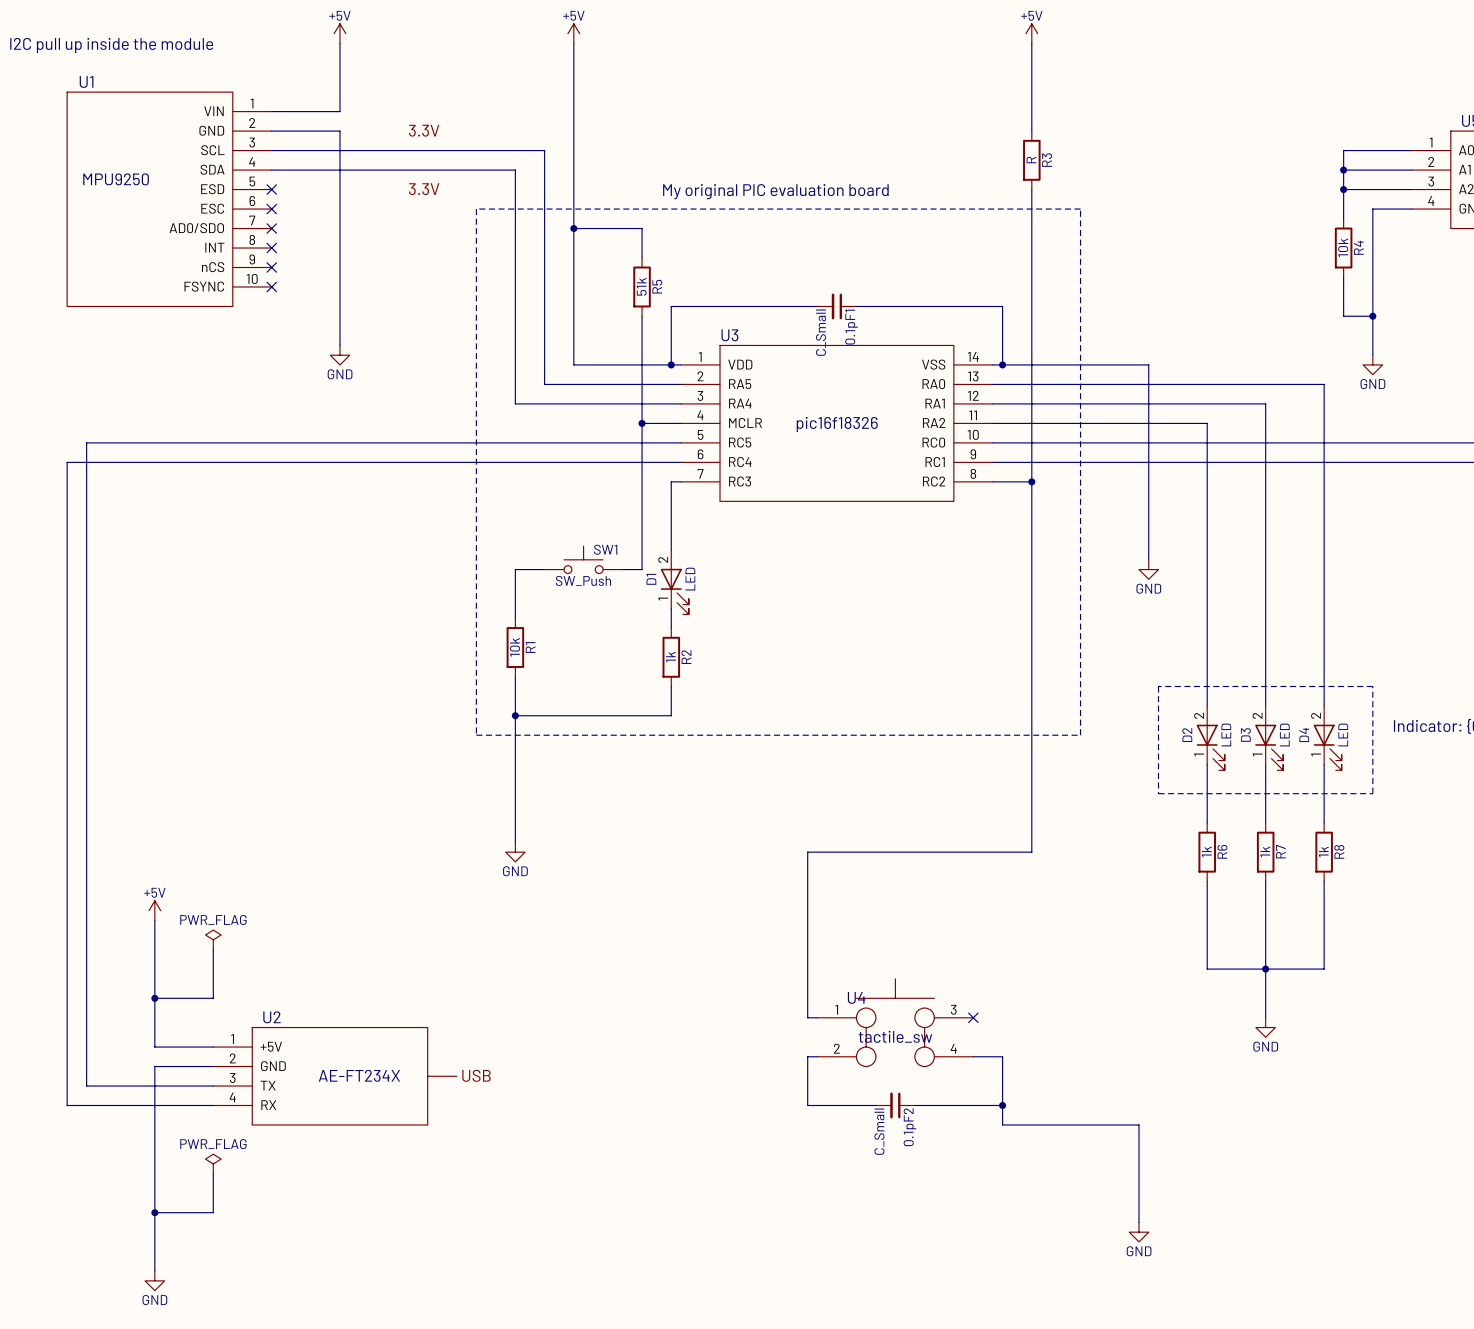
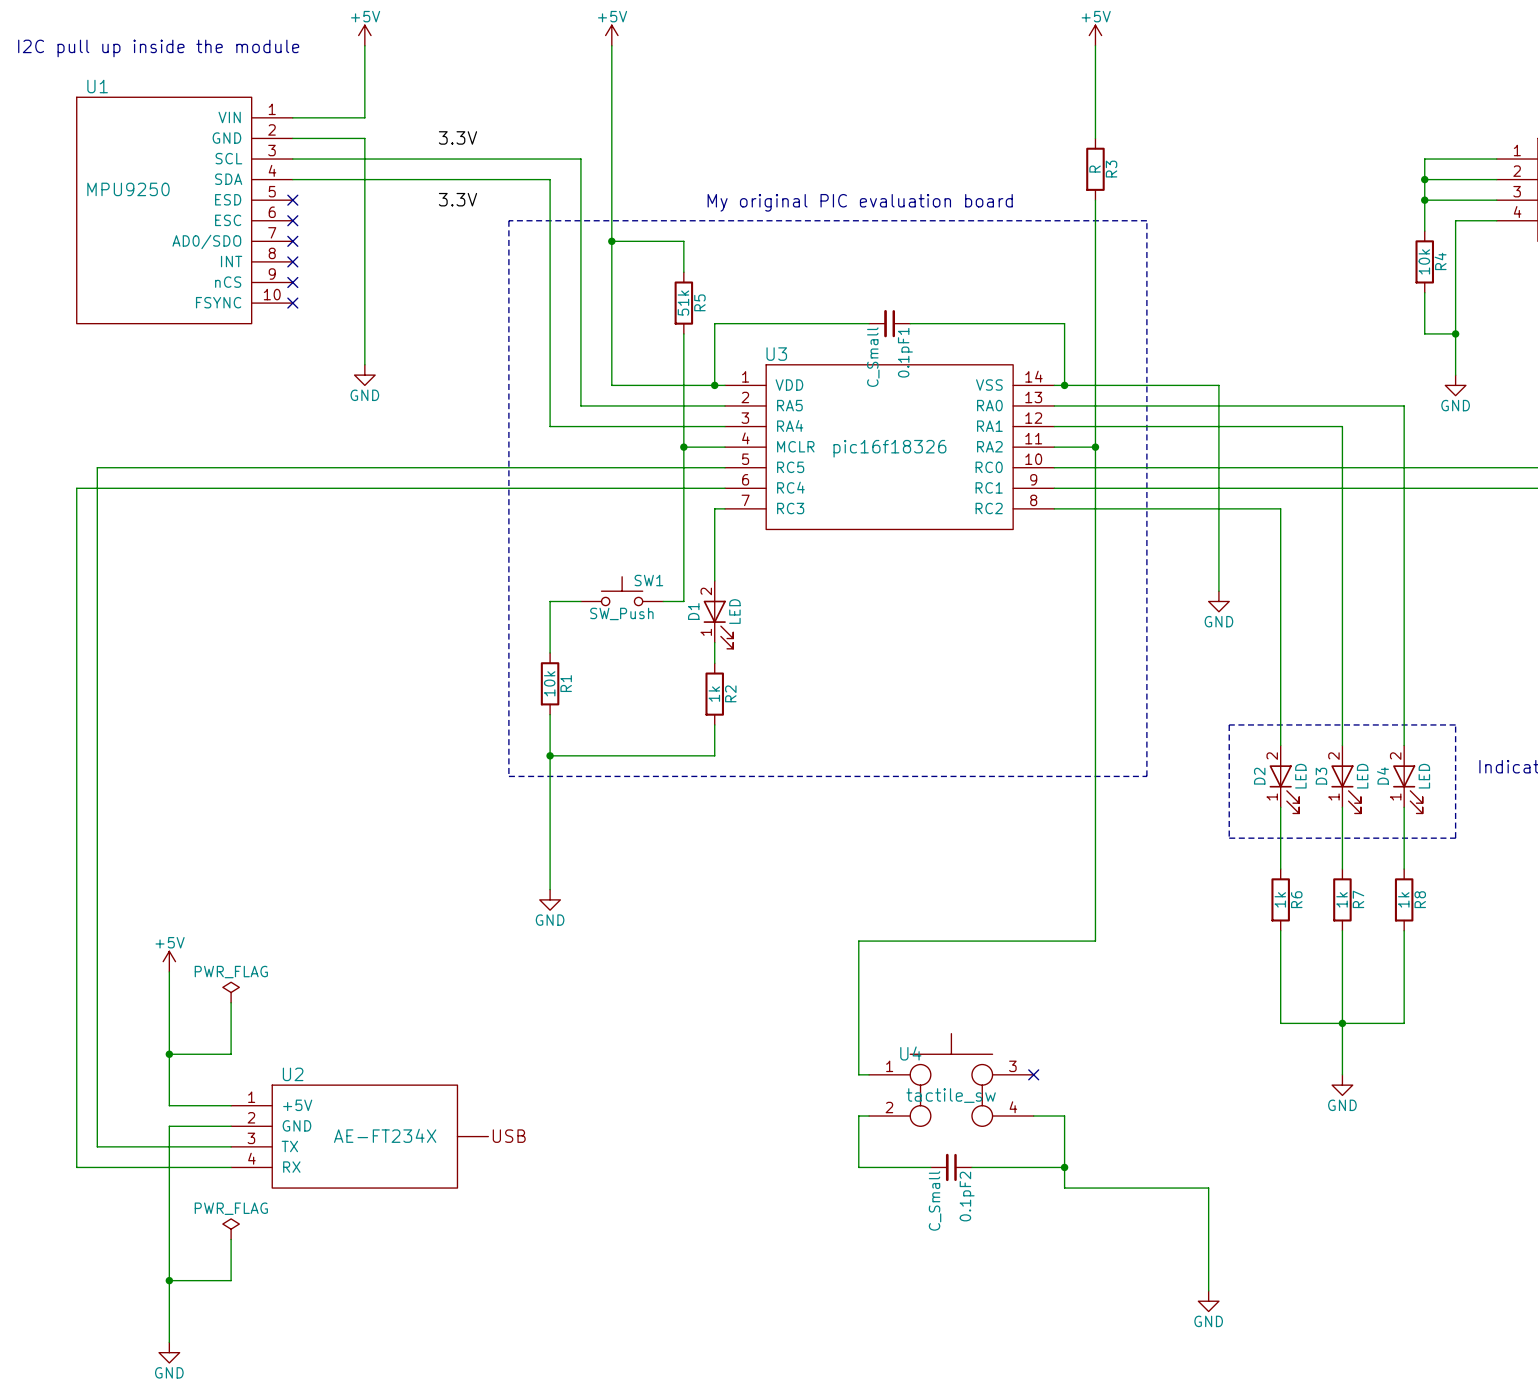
wire: (1031, 423) (1207, 423) (1207, 481) -> (1095, 508) (1280, 508)
junction: none -> (1095, 447)
junction: (1031, 481) -> none
wire: (1031, 852) (807, 852) (807, 891) -> (1095, 899) (1095, 941) (858, 941)

